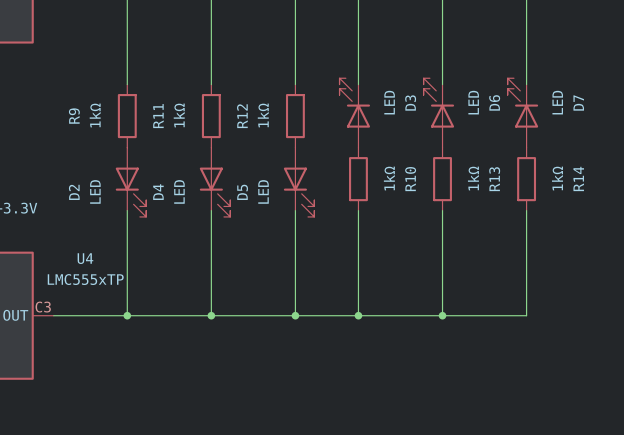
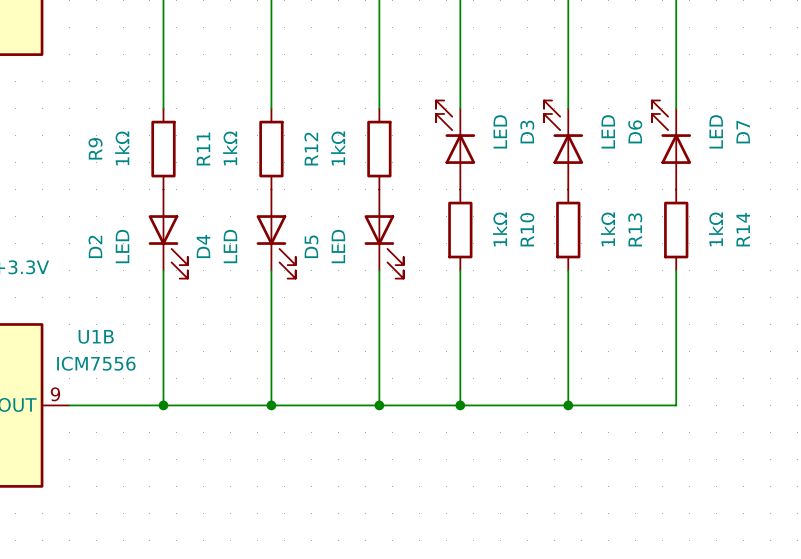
U4 name: U4 (85, 258) -> U1B (96, 336)
U4 value: LMC555xTP (85, 279) -> ICM7556 (96, 363)
U4 pin number: C3 (43, 307) -> 9 (55, 394)

